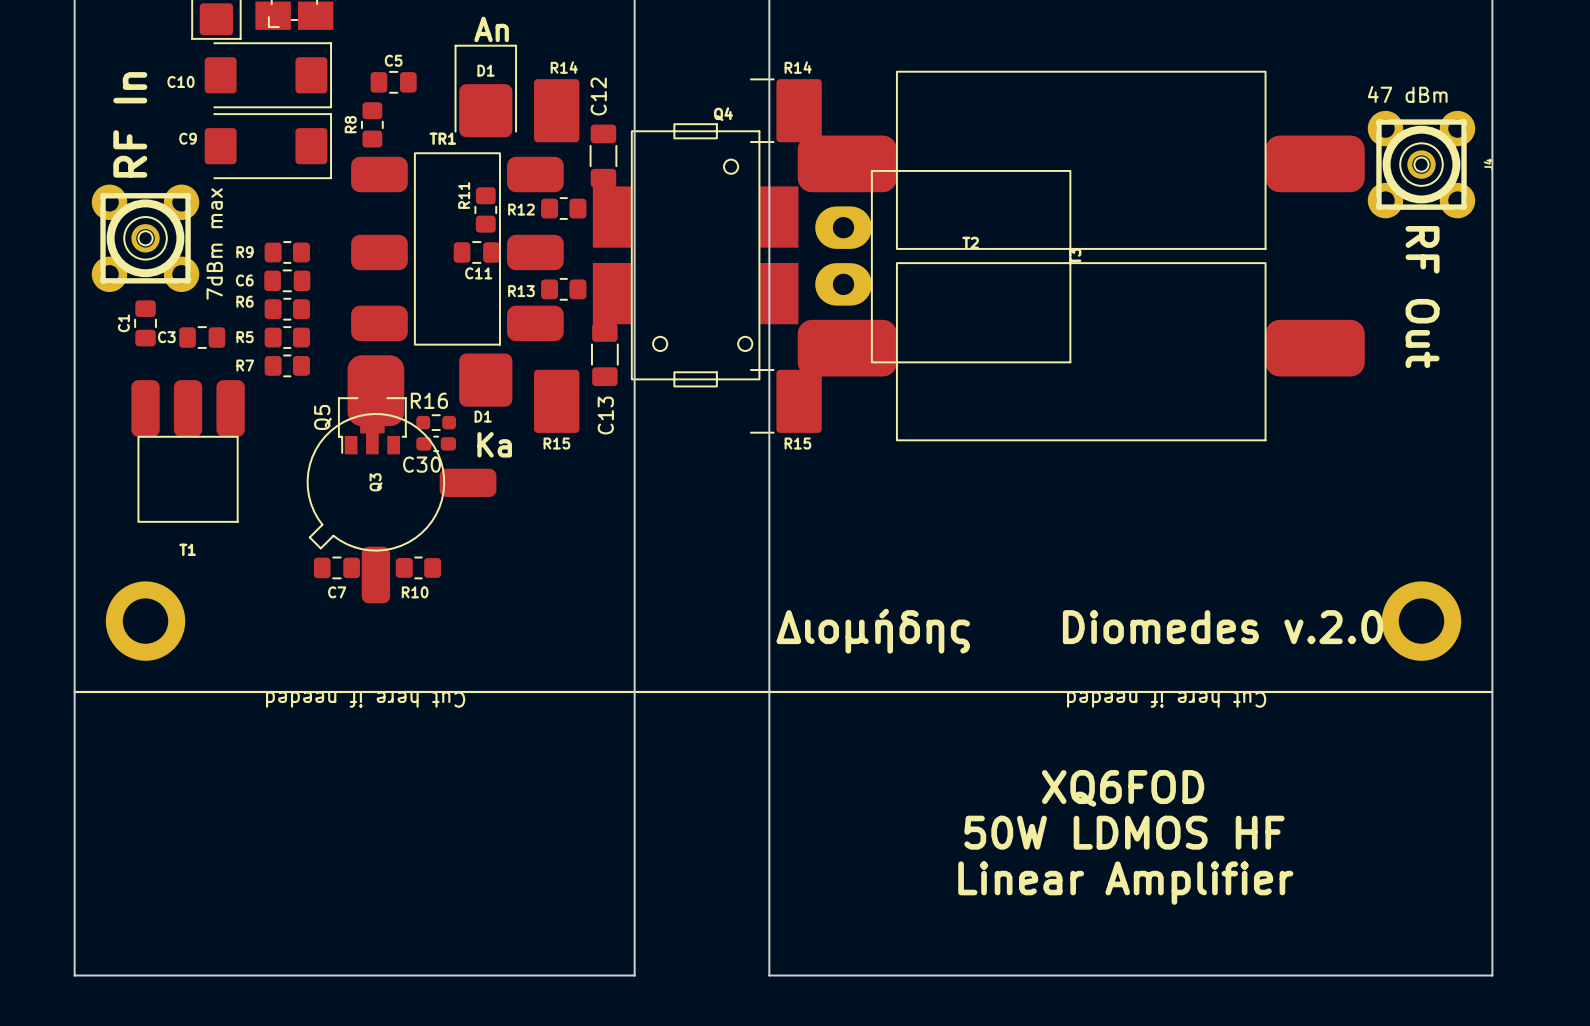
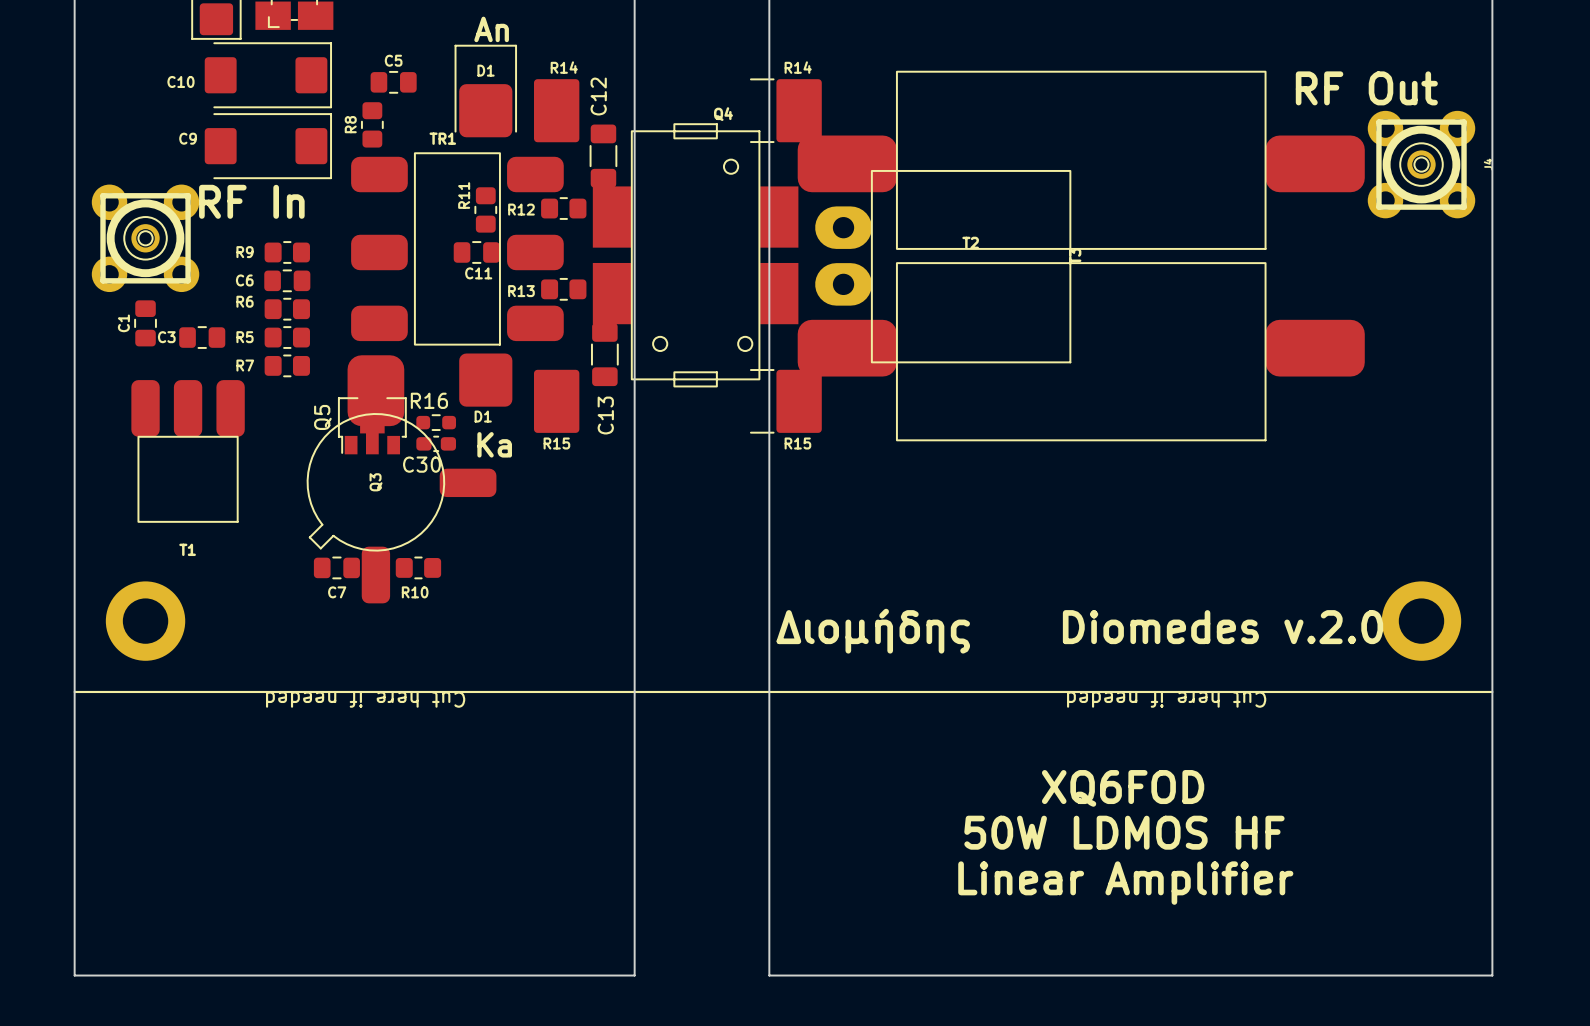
text: 47 dBm (1407, 94) -> RF Out (1366, 88)
text rotation: 0° (130, 124) -> 90° clockwise (251, 201)
text: 7dBm max (214, 243) -> none
text: RF Out (1422, 297) -> none

